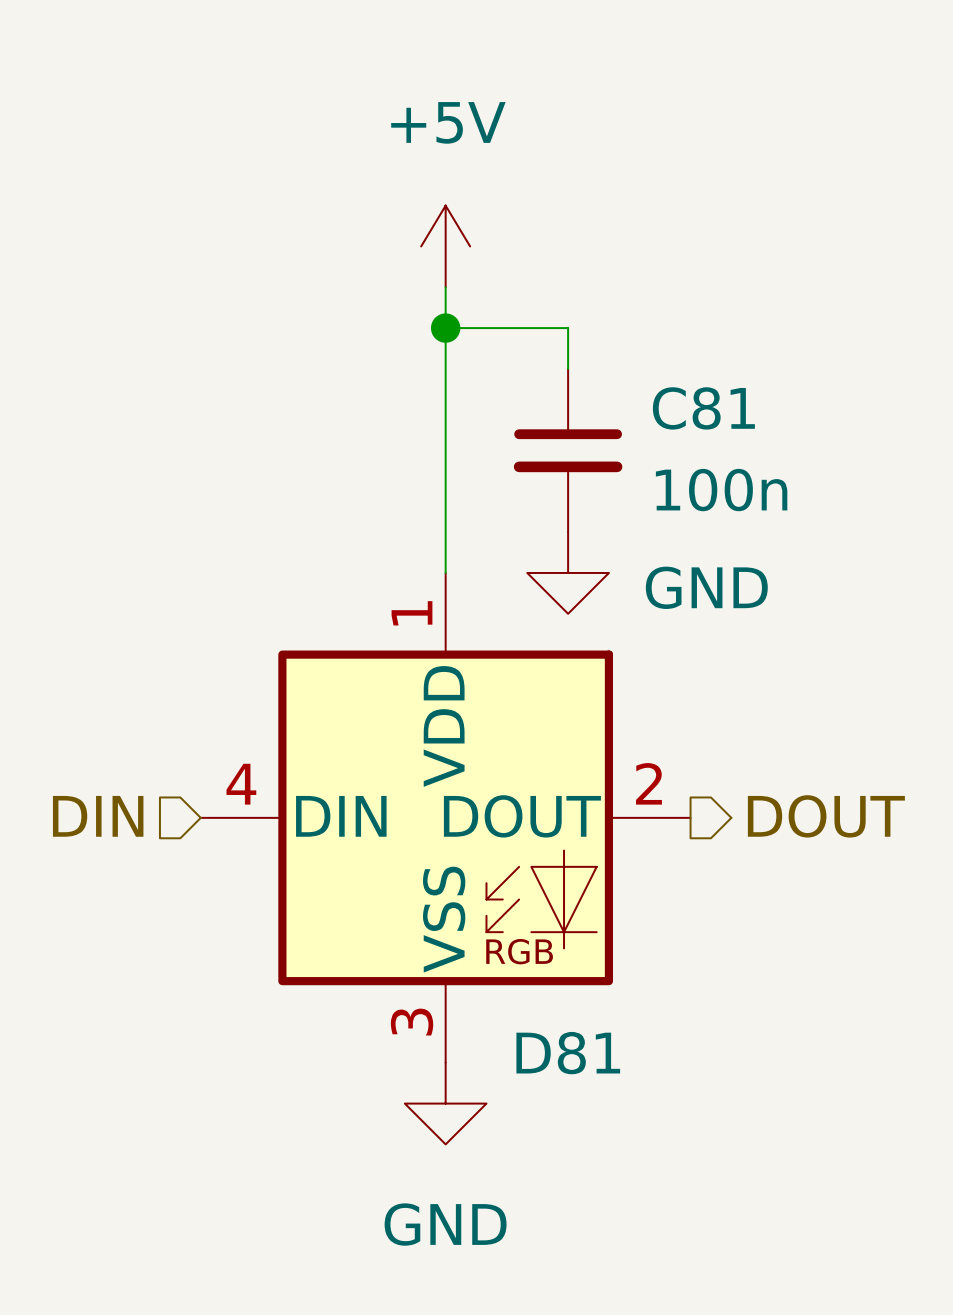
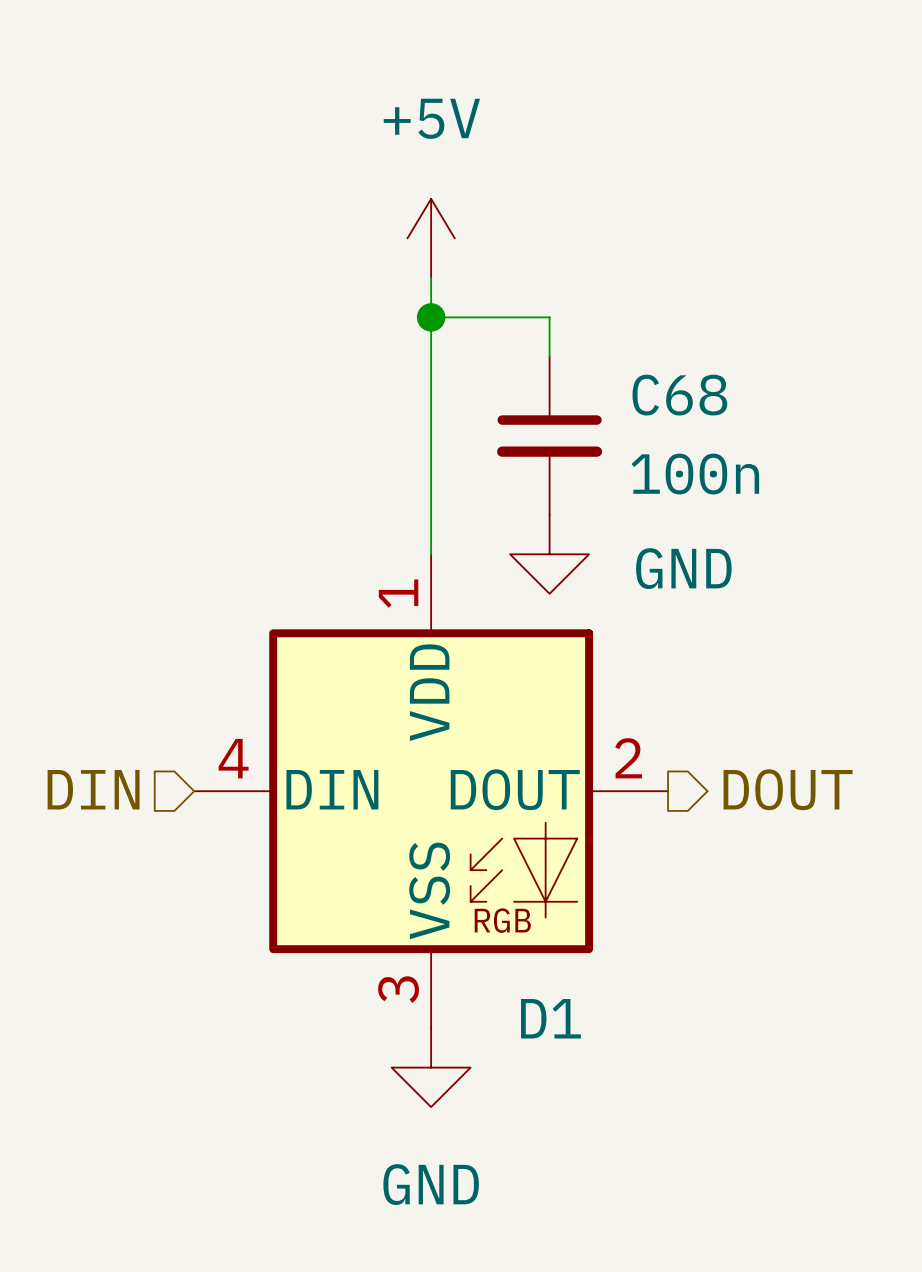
C81 name: C81 (703, 408) -> C68 (679, 395)
D81 name: D81 (568, 1053) -> D1 (550, 1018)

